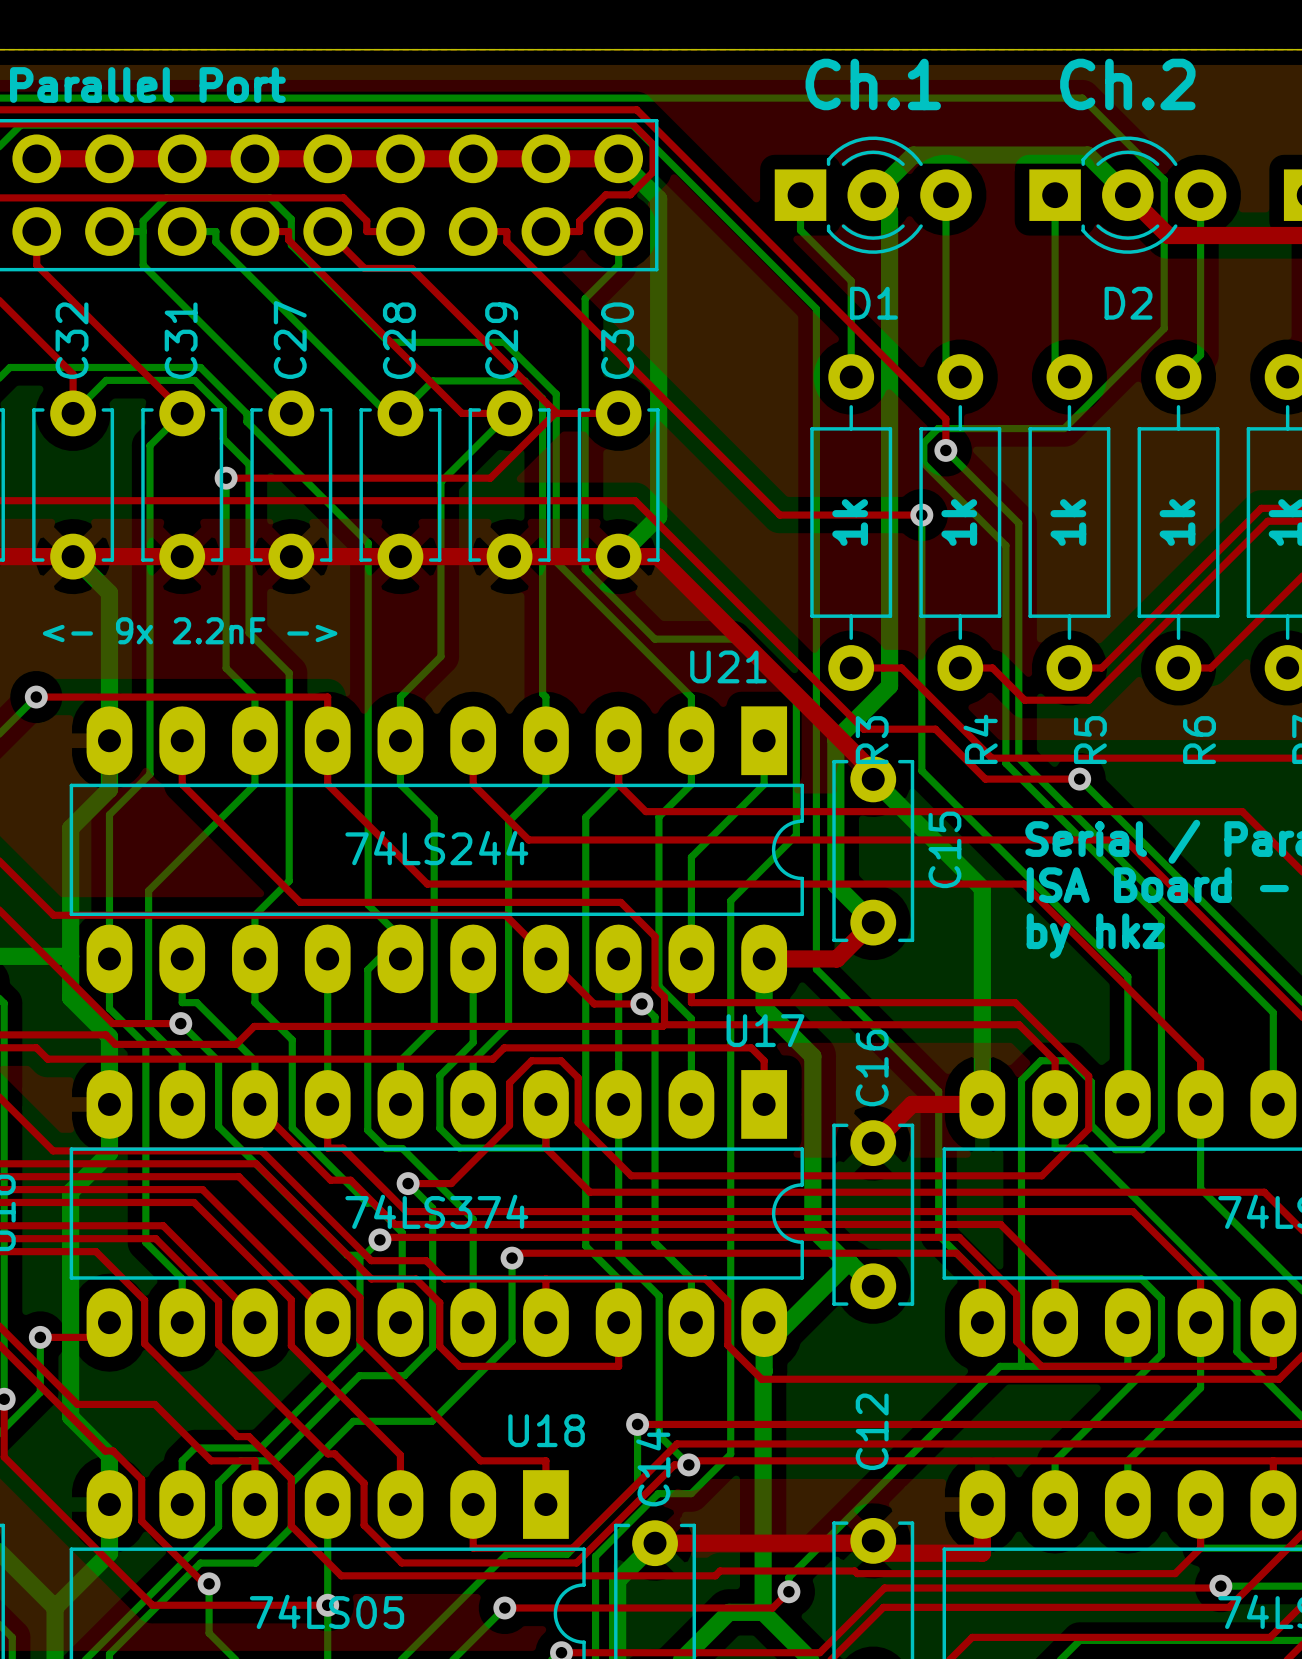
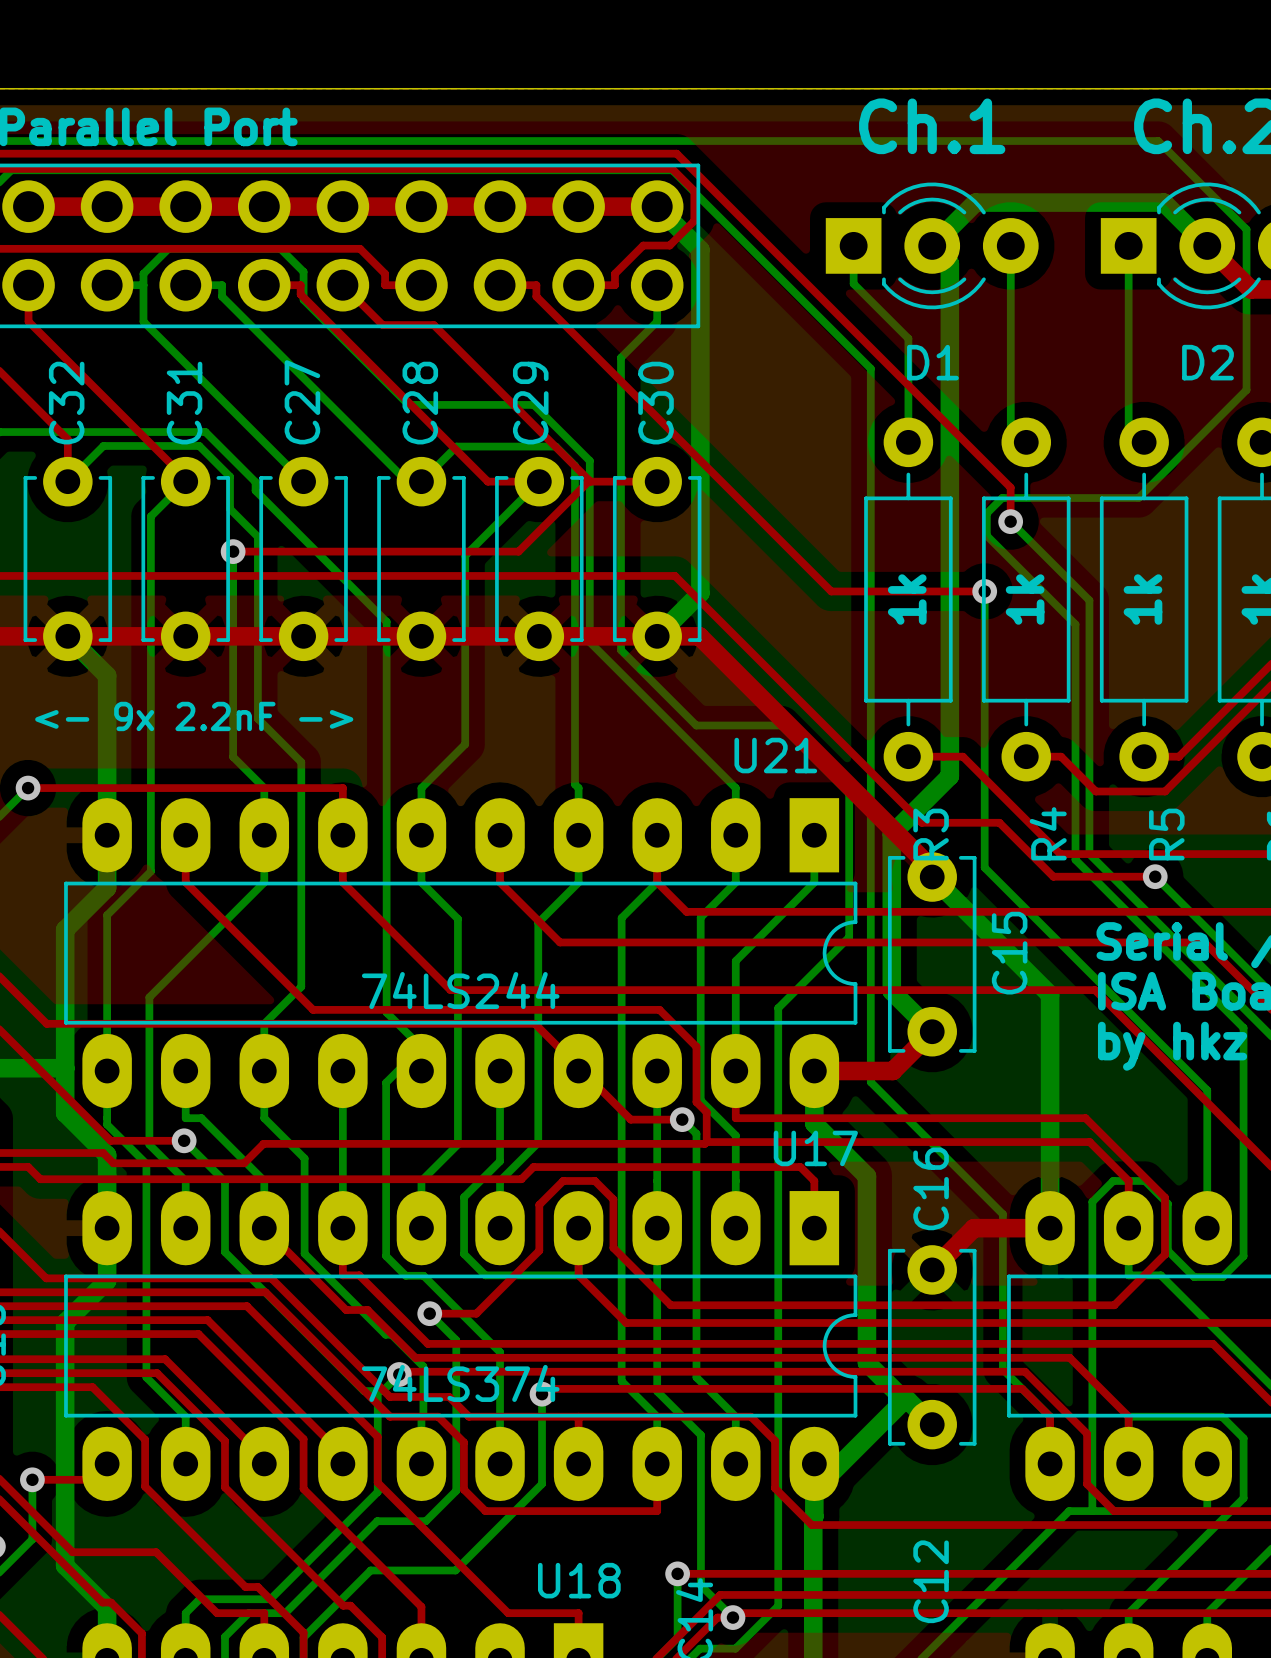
text position: 74LS244 (436, 848) -> 74LS244 (460, 990)
text position: 74LS374 (436, 1211) -> 74LS374 (460, 1383)

